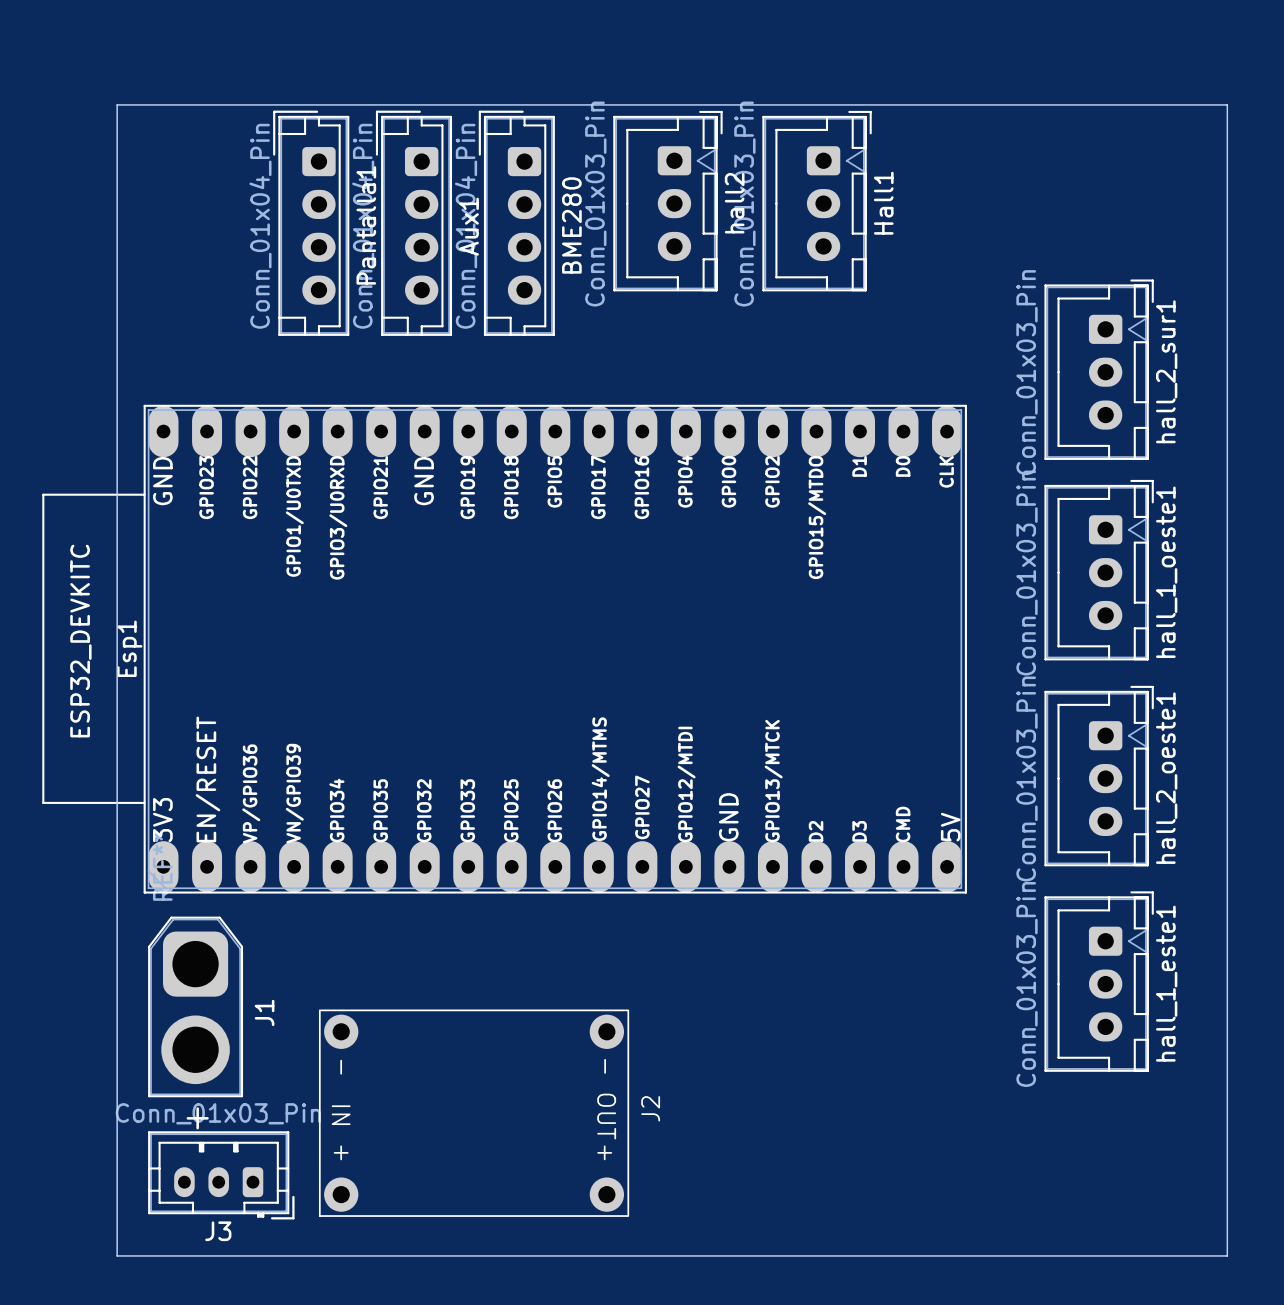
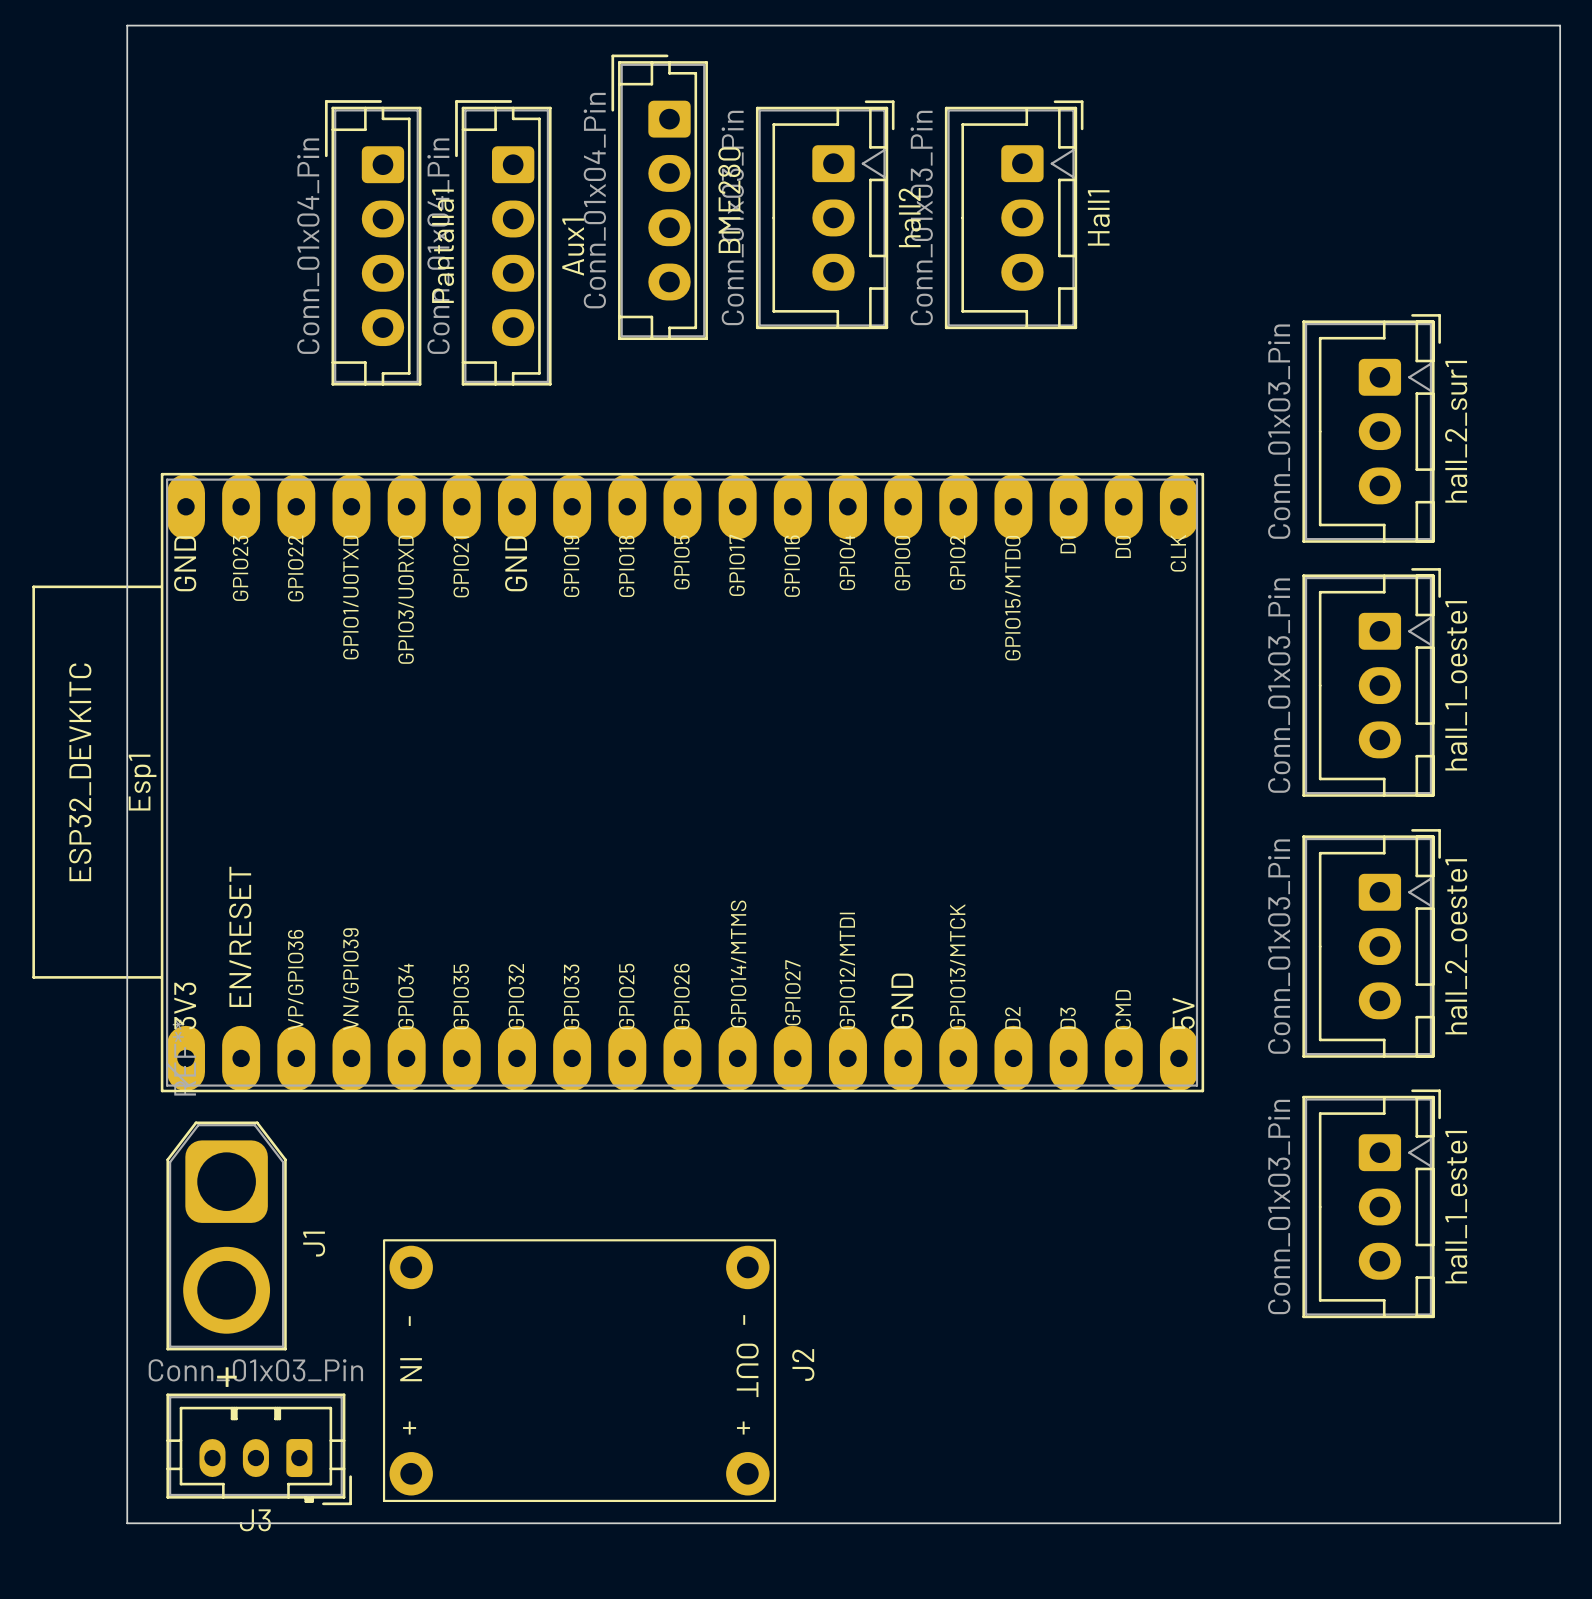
board edge: (117, 104) (1227, 104) (1227, 1255) (117, 1255) (117, 1233) -> (127, 92) (127, 25) (1560, 25) (1560, 1523) (127, 1523)
BME280 position: (516, 223) -> (659, 197)

